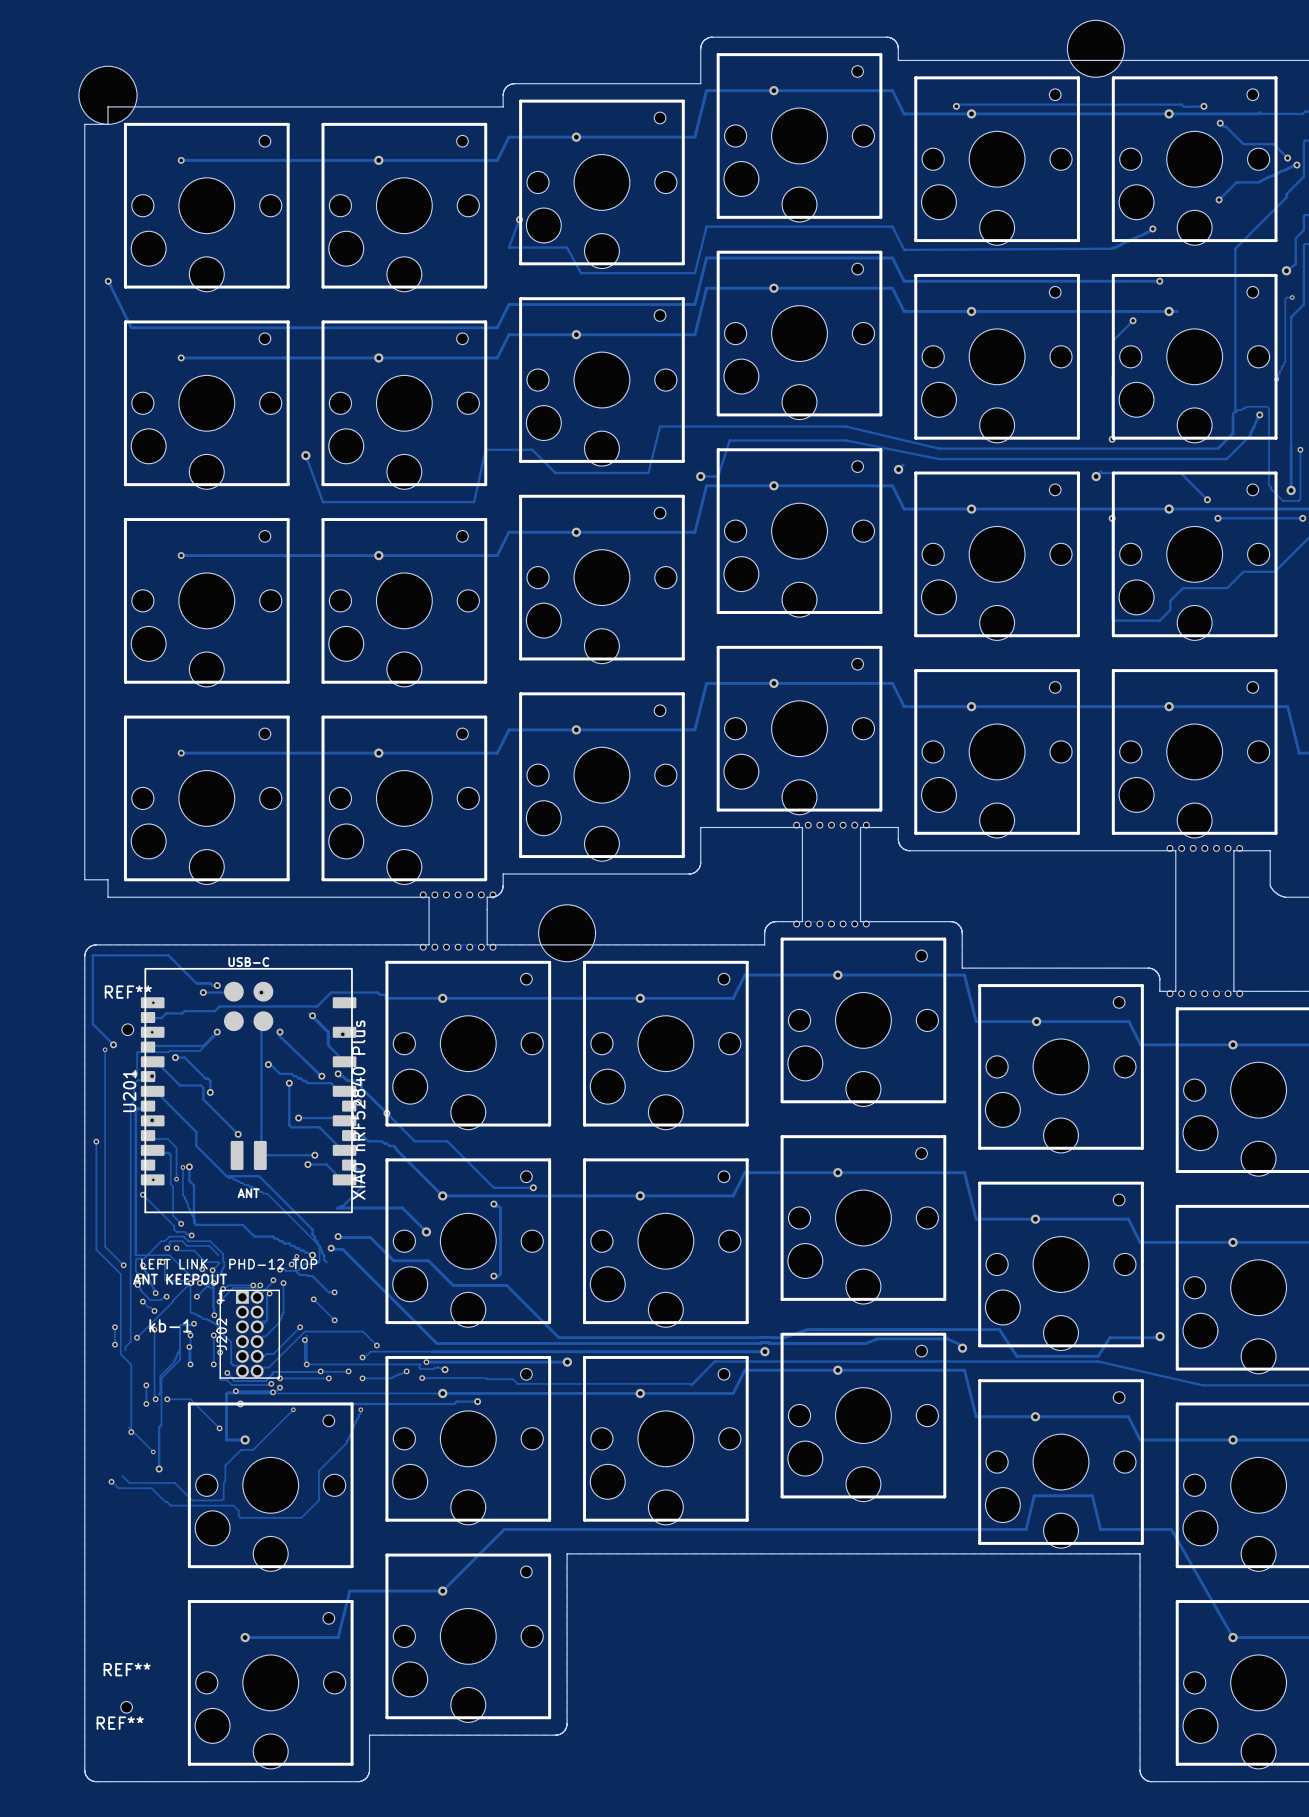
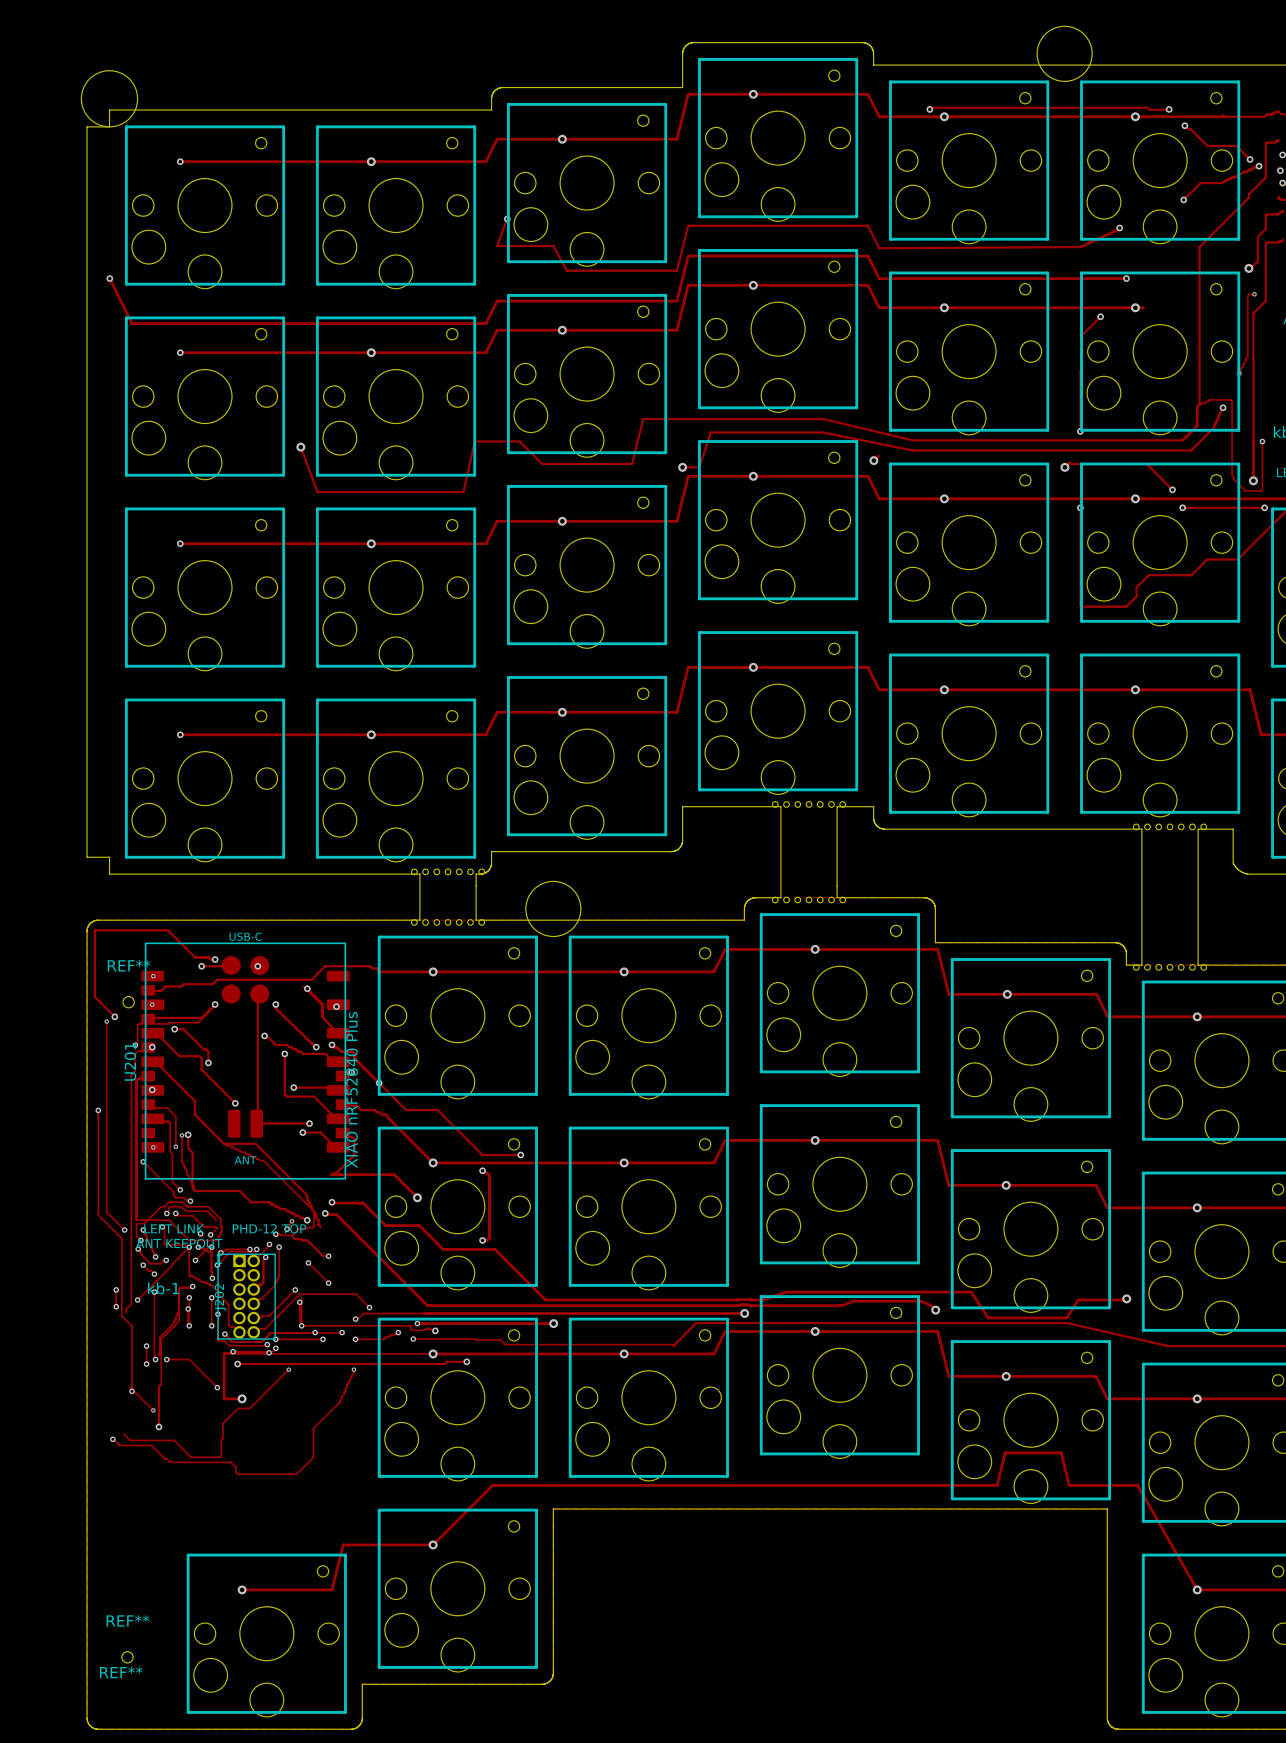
part: (270, 1486) -> none

